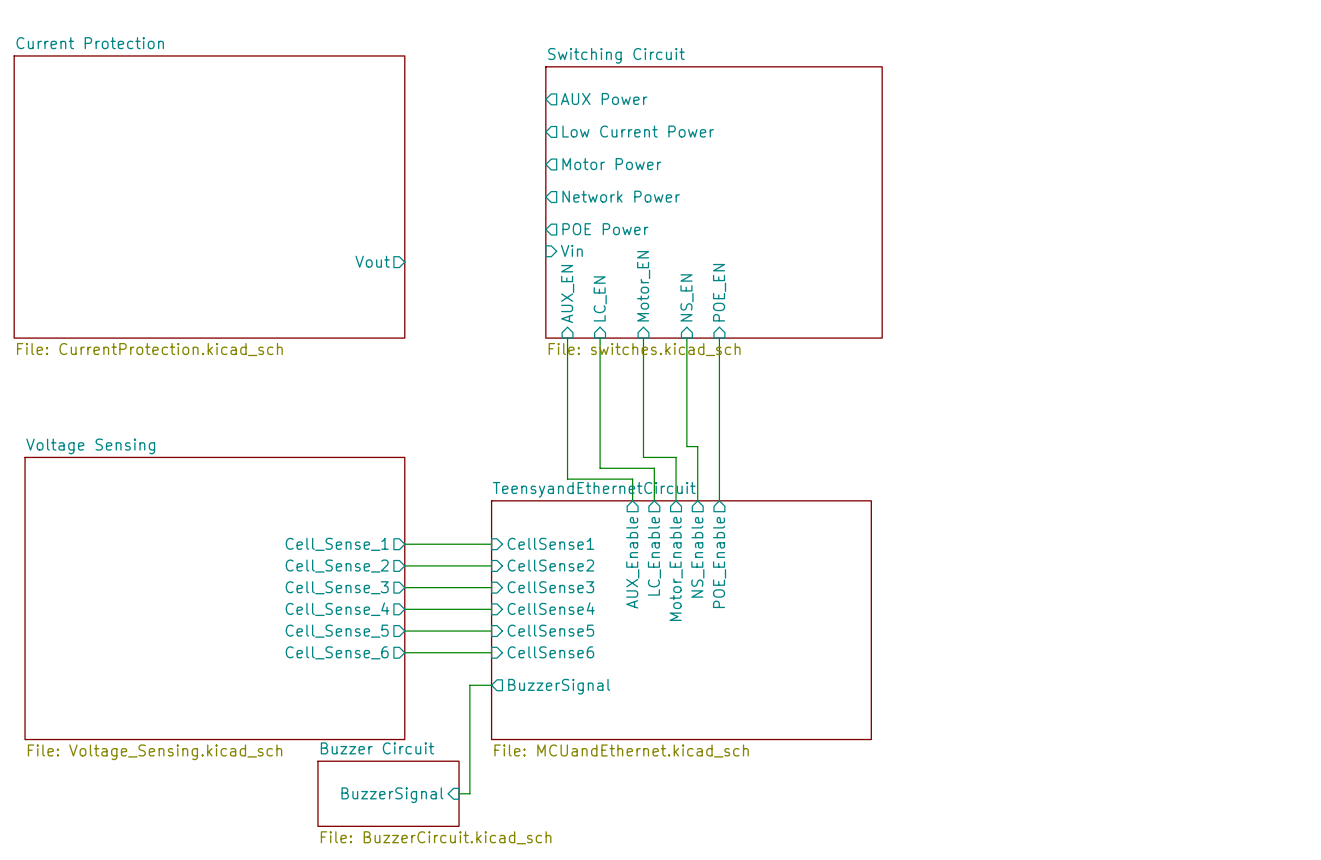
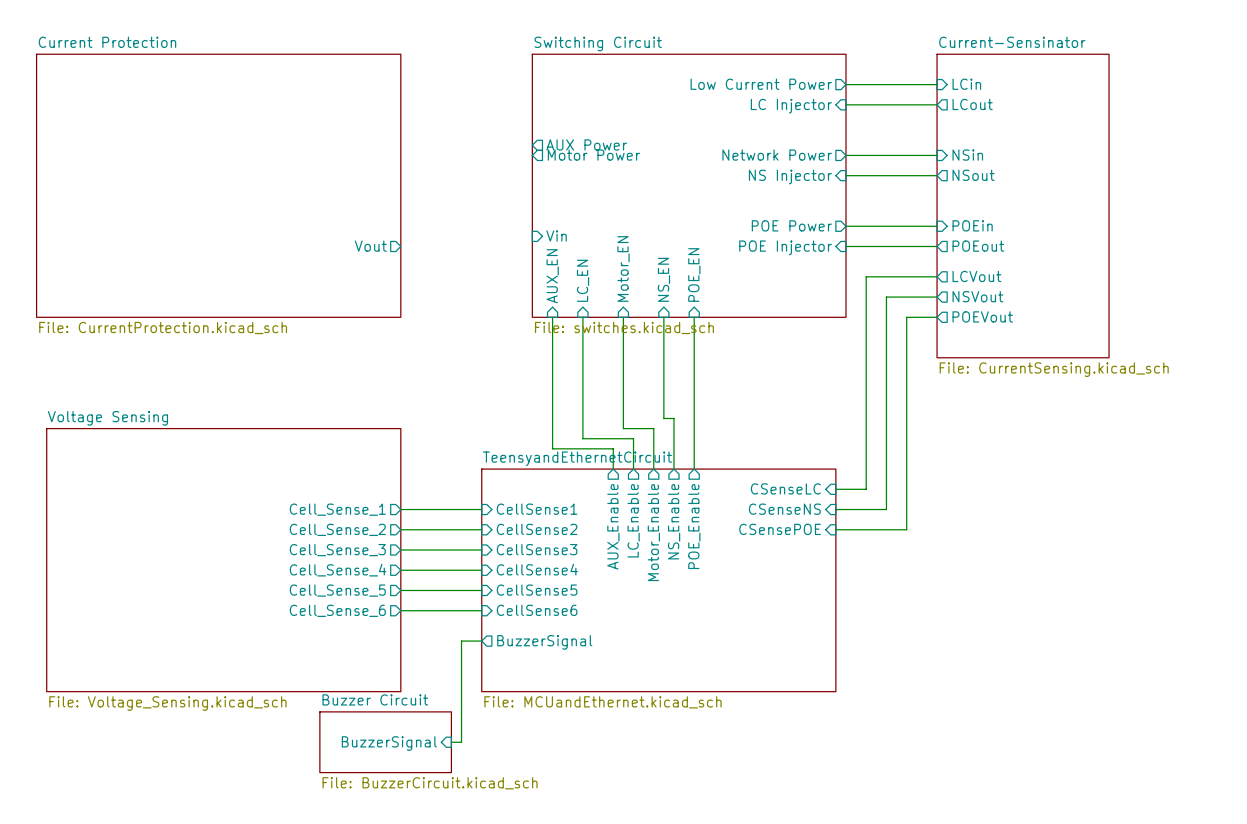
sheet Switching Circuit shape: [545, 66, 883, 339] -> [531, 53, 847, 318]
sheet pin: none -> Low Current Power (761, 84)
wire: none -> (845, 84) (937, 84)
sheet pin: none -> LCin (966, 84)
sheet pin position: AUX Power (604, 98) -> AUX Power (586, 144)
sheet pin: none -> LCout (972, 104)
wire: none -> (845, 104) (937, 104)
sheet pin: none -> LC Injector (791, 106)
sheet pin: Low Current Power (638, 131) -> none
sheet pin: none -> Network Power (777, 155)
wire: none -> (845, 155) (937, 155)
sheet pin: none -> NSin (967, 155)
sheet pin: none -> NSout (973, 175)
wire: none -> (845, 175) (937, 175)
sheet pin: none -> NS Injector (790, 176)
sheet pin: Network Power (621, 196) -> none
sheet Current-Sensinator: none -> File: CurrentSensing.kicad_sch (1023, 206)
sheet pin: POE Power (605, 229) -> none
sheet pin: none -> POE Power (791, 225)
wire: none -> (845, 226) (937, 226)
sheet pin: none -> POEin (972, 225)
sheet pin: none -> POEout (978, 246)
wire: none -> (845, 246) (937, 246)
sheet pin: none -> POE Injector (785, 247)
wire: none -> (937, 276) (866, 276) (866, 489) (835, 489)
sheet pin: none -> LCVout (976, 276)
sheet pin: none -> NSVout (977, 296)
wire: none -> (937, 297) (886, 297) (886, 509) (835, 509)
sheet pin: none -> POEVout (982, 316)
wire: none -> (937, 317) (906, 317) (906, 529) (835, 529)
sheet pin: none -> CSenseLC (785, 488)
sheet pin: none -> CSenseNS (784, 509)
sheet pin: none -> CSensePOE (780, 529)

